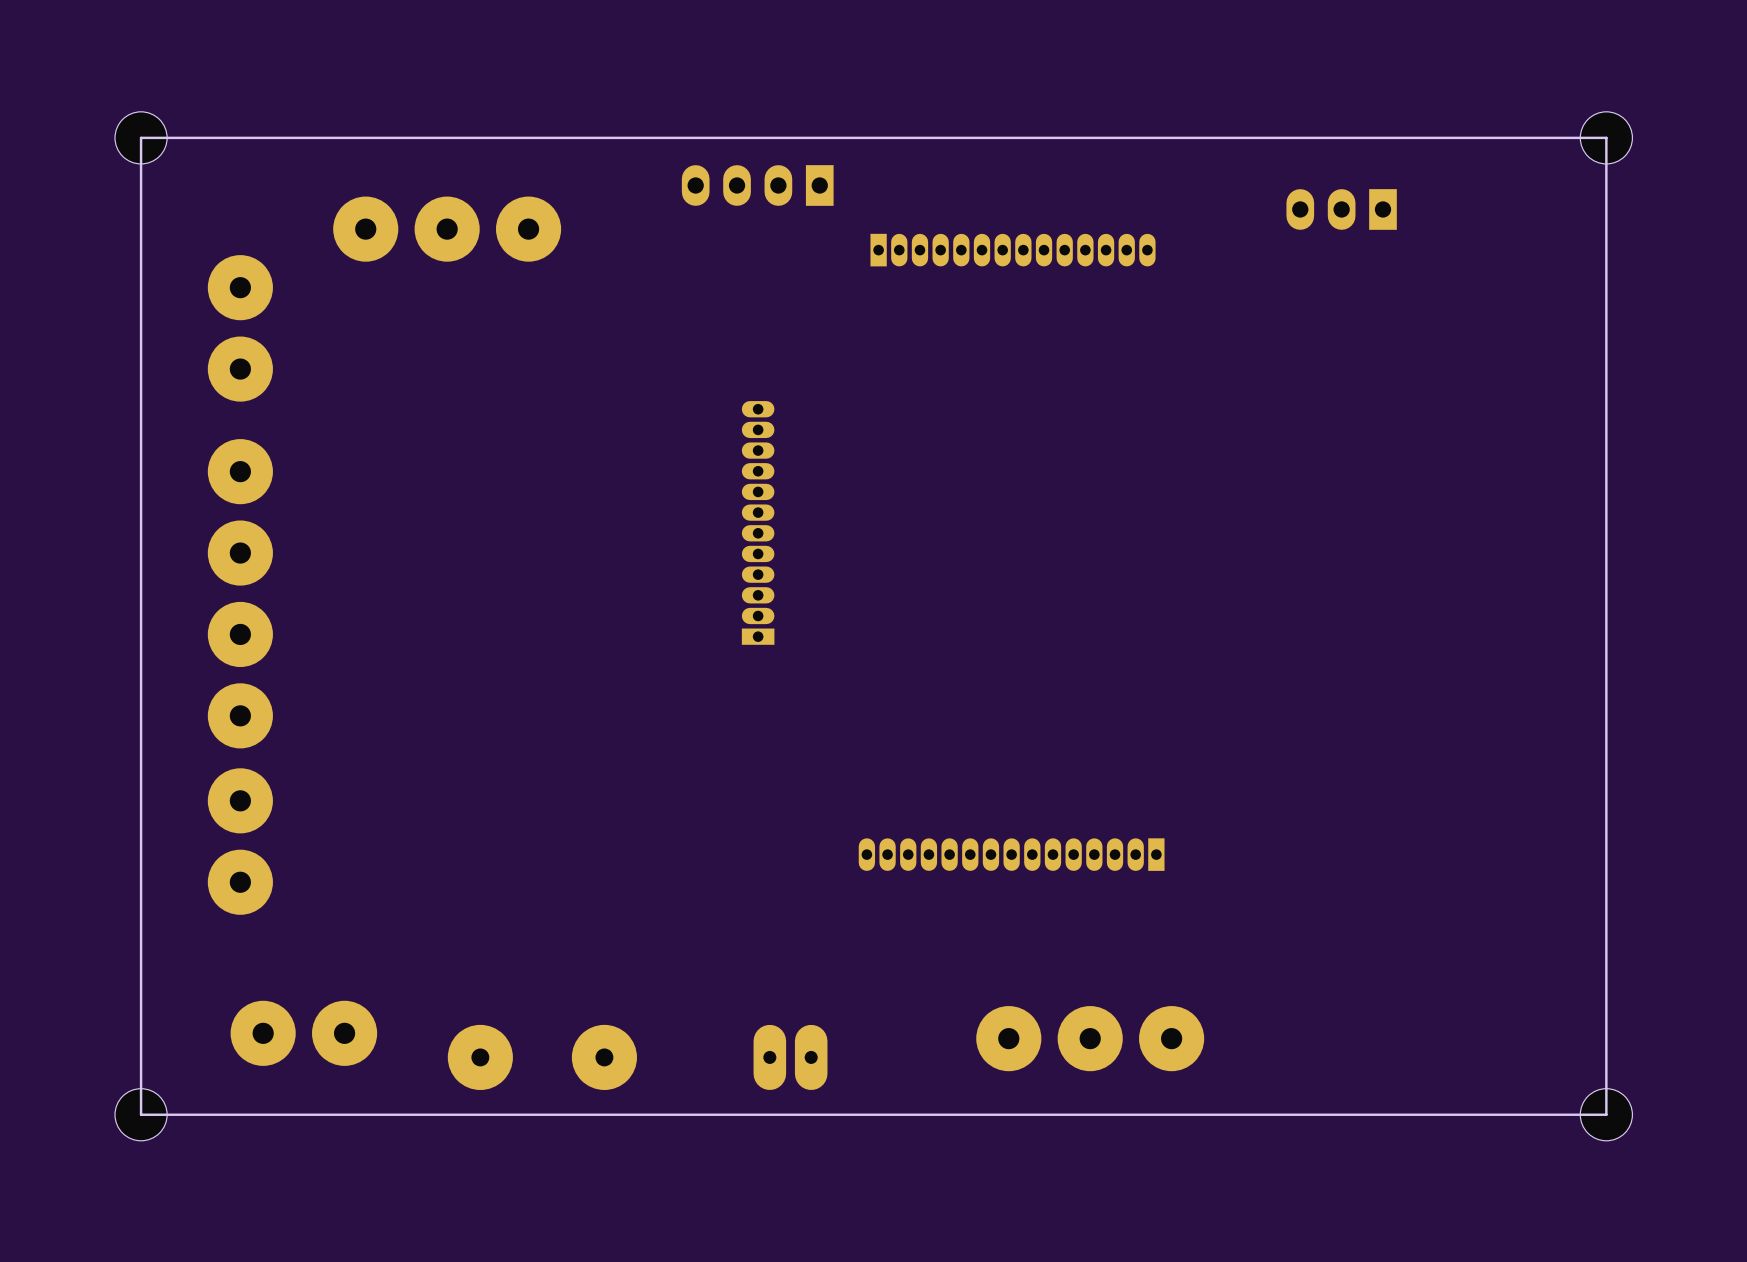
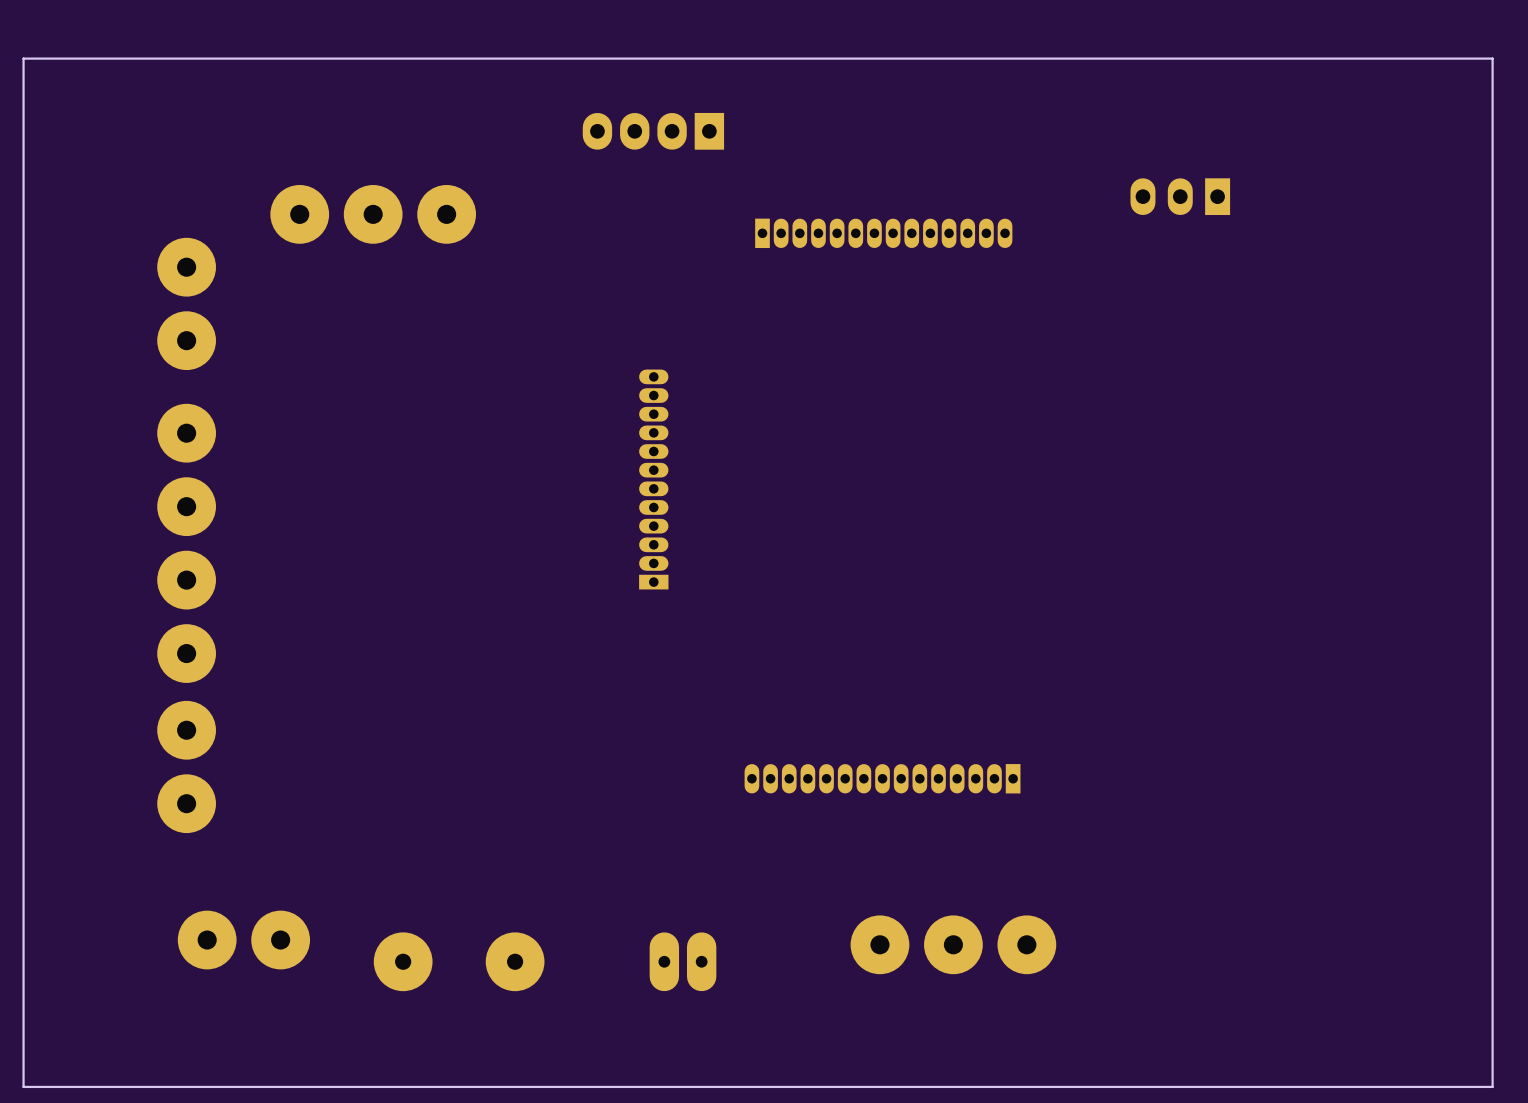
part: (141, 137) -> none
part: none -> (653, 131)
board edge: (1606, 137) (141, 137) (141, 1114) (1606, 1114) (1606, 137) -> (1492, 58) (1492, 1086) (23, 1086) (23, 58) (1492, 58)
part: (1606, 137) -> none
part: (757, 185) -> none
part: (141, 1114) -> none
part: (1606, 1114) -> none

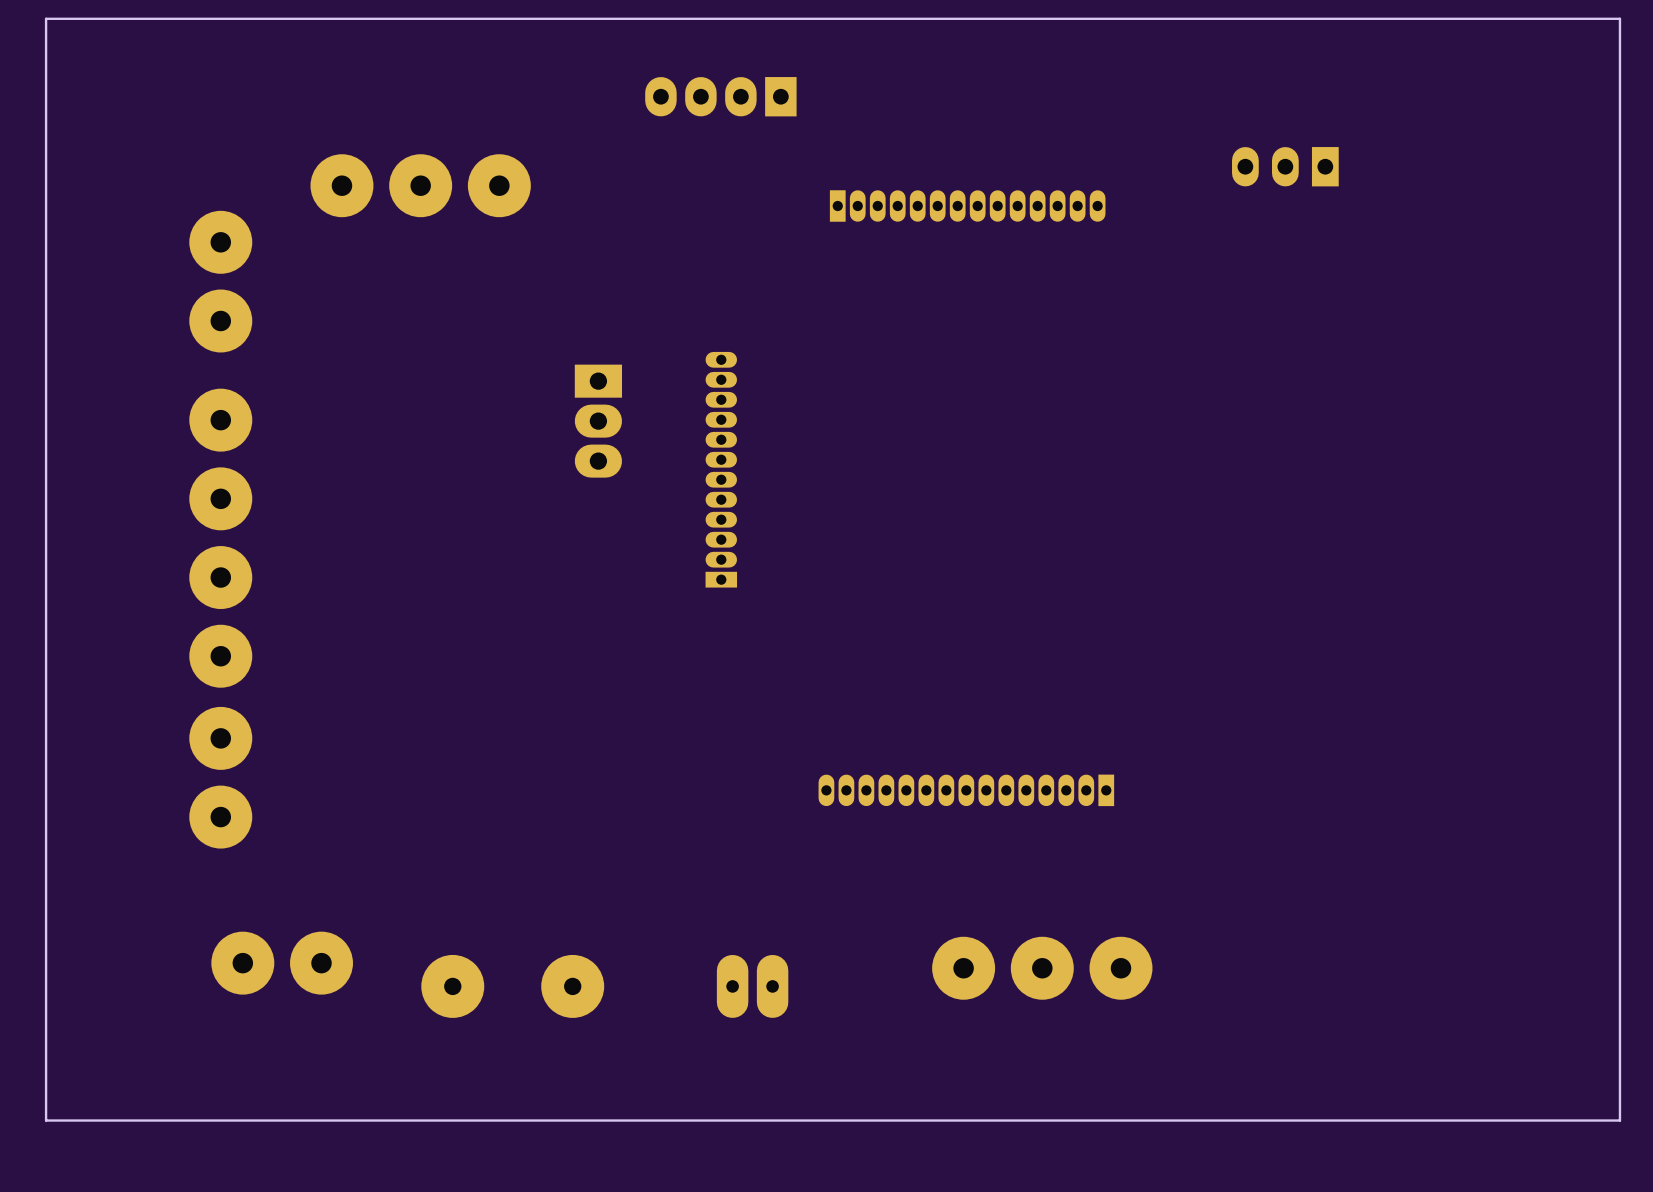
part: none -> (598, 421)

